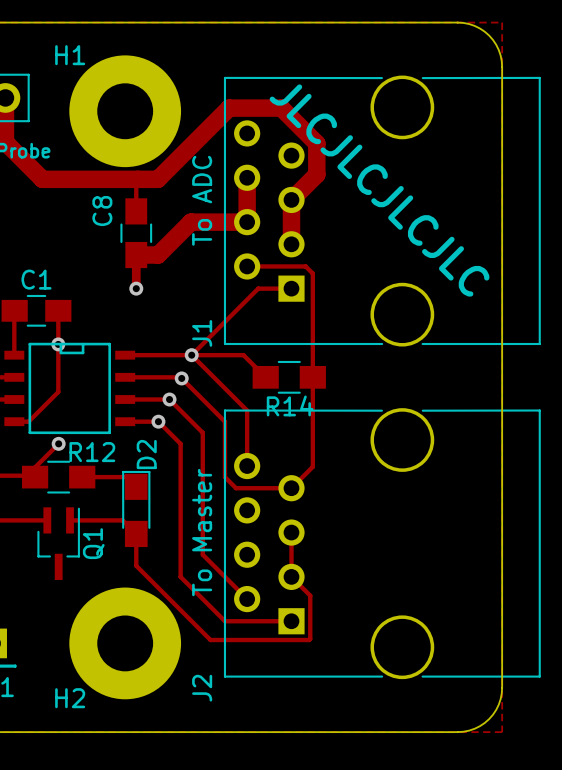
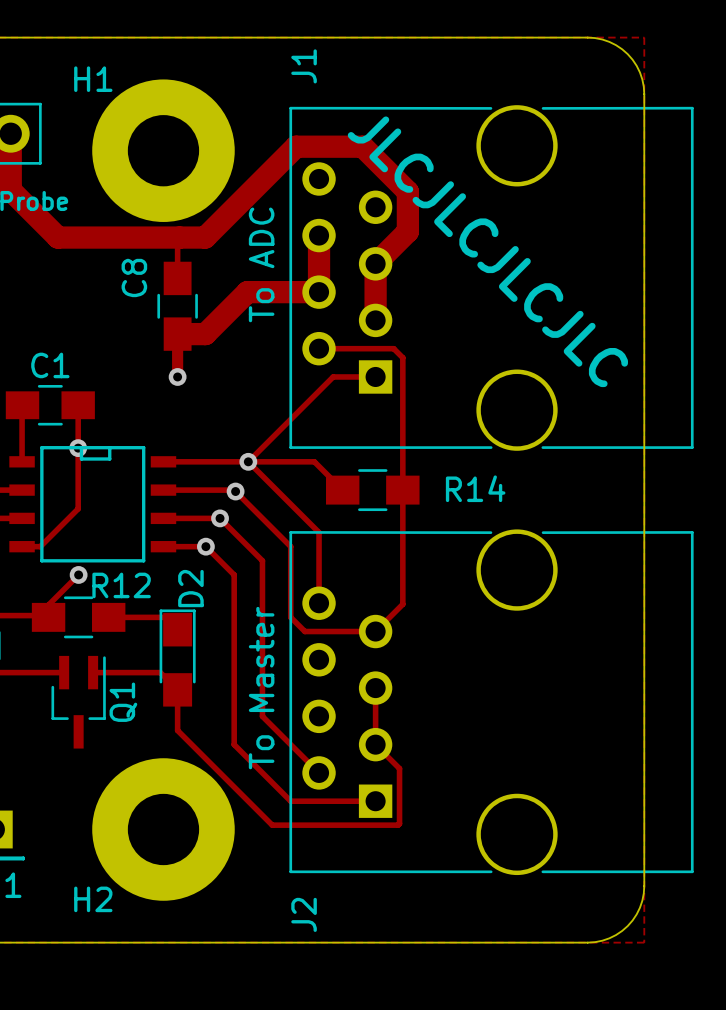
J1 name position: J1 (202, 333) -> J1 (304, 66)
R14 name position: R14 (290, 405) -> R14 (475, 488)
J2 name position: J2 (202, 688) -> J2 (304, 914)

